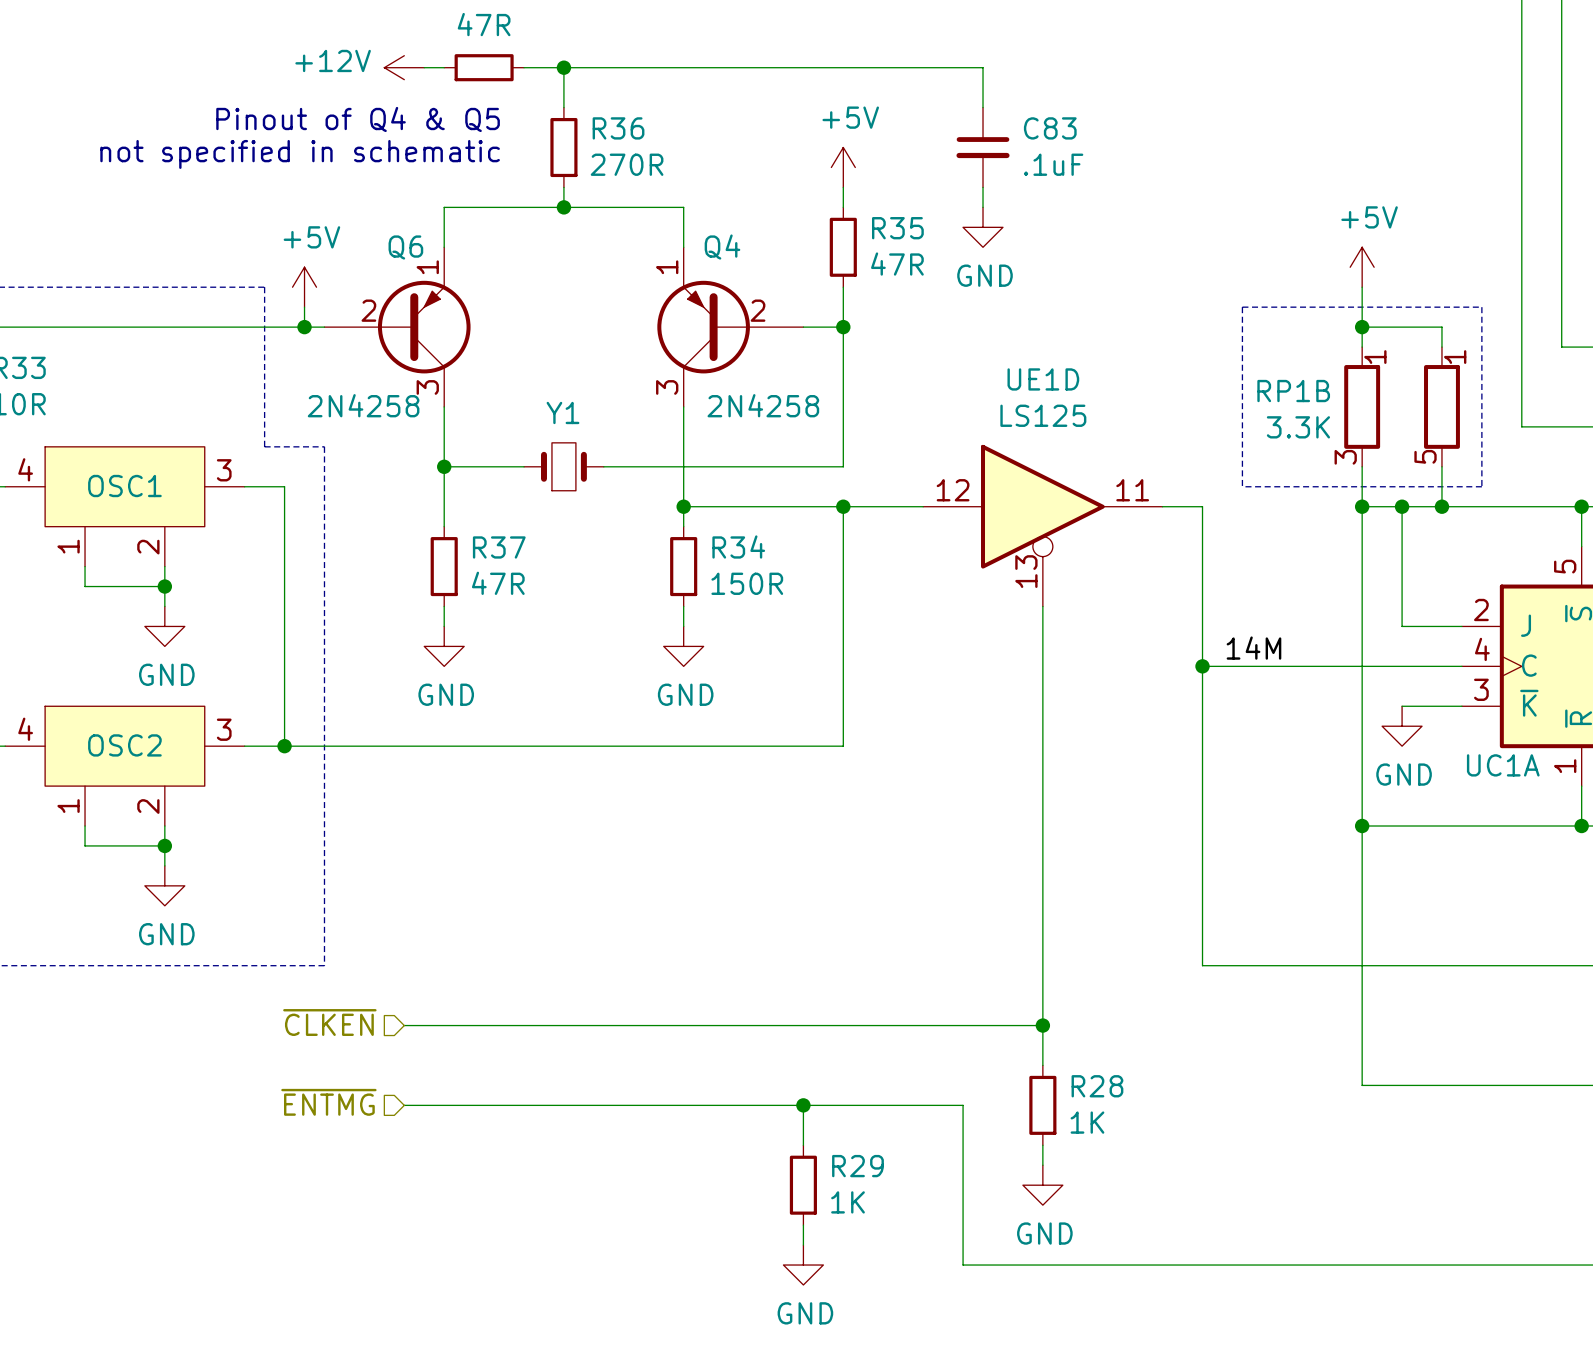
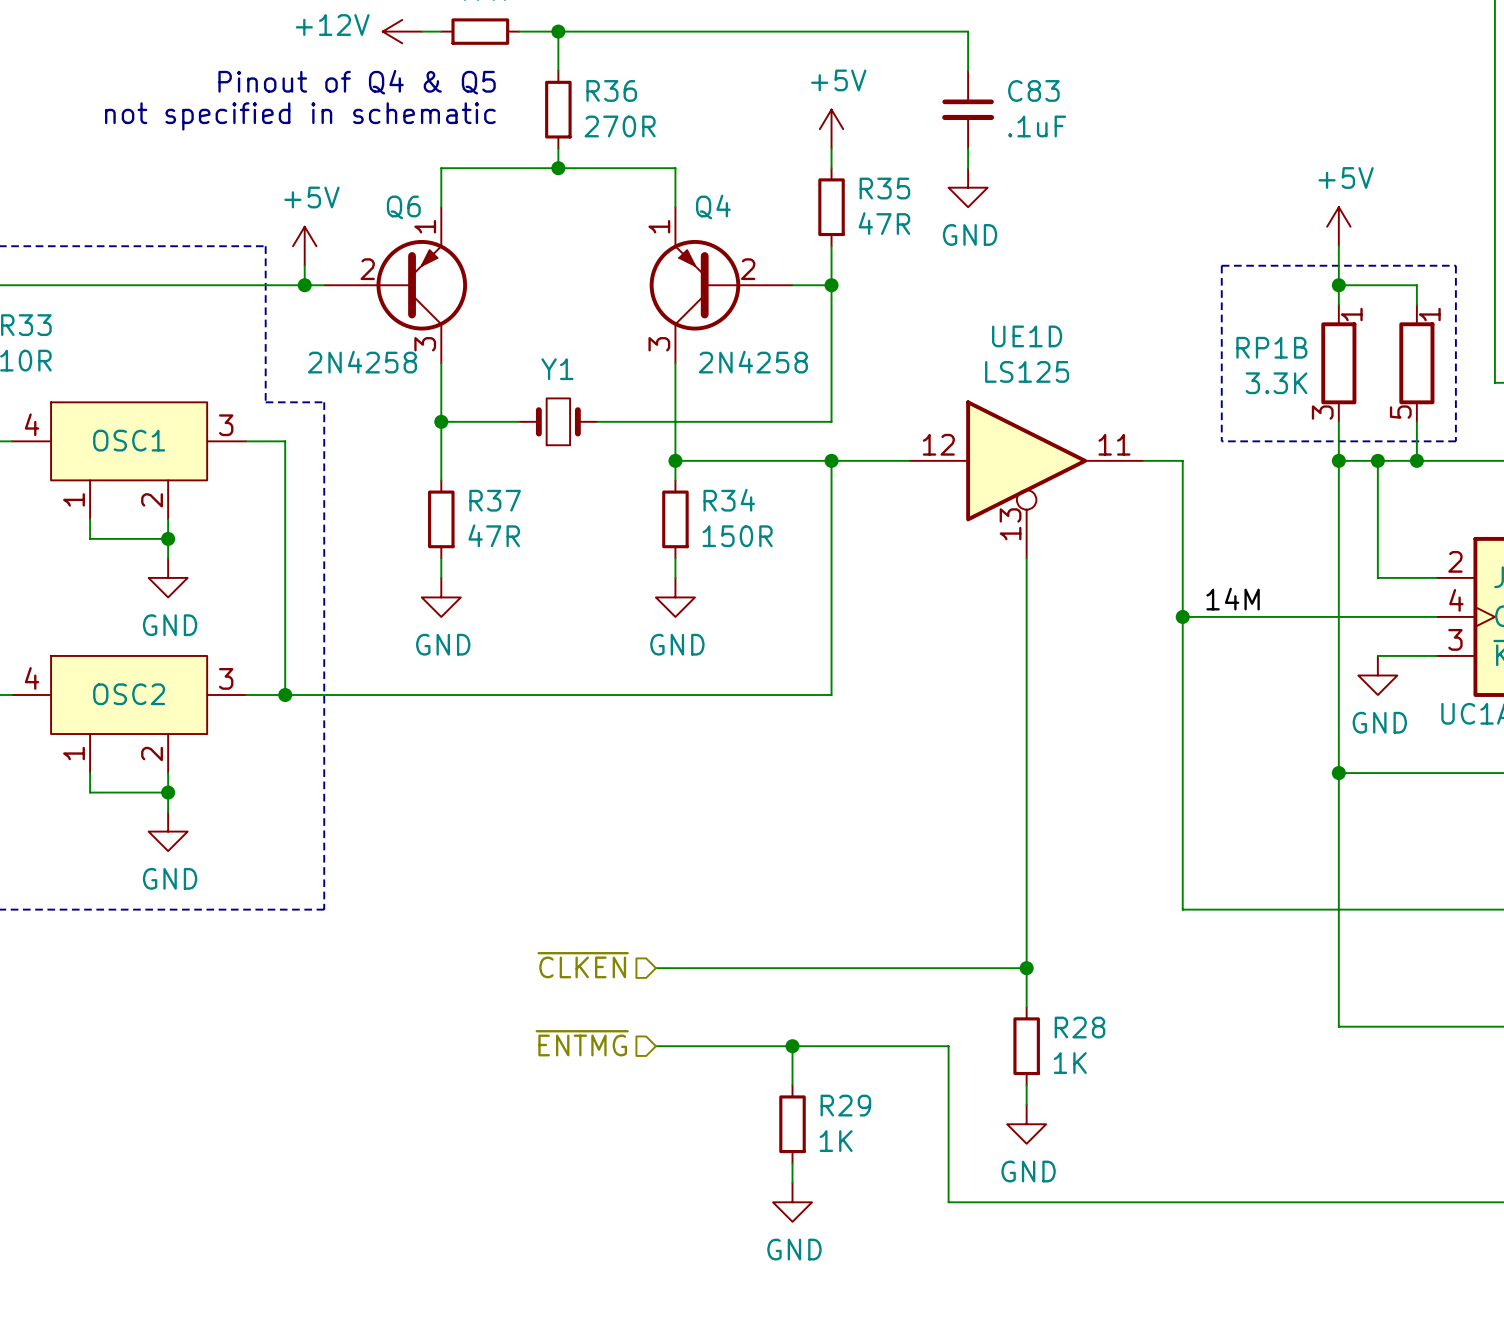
hierarchical label position: ~{CLKEN} (329, 1022) -> ~{CLKEN} (583, 965)
wire: (404, 1025) (663, 1025) -> none
hierarchical label position: ~{ENTMG} (328, 1102) -> ~{ENTMG} (582, 1043)
wire: (404, 1105) (663, 1105) -> none

